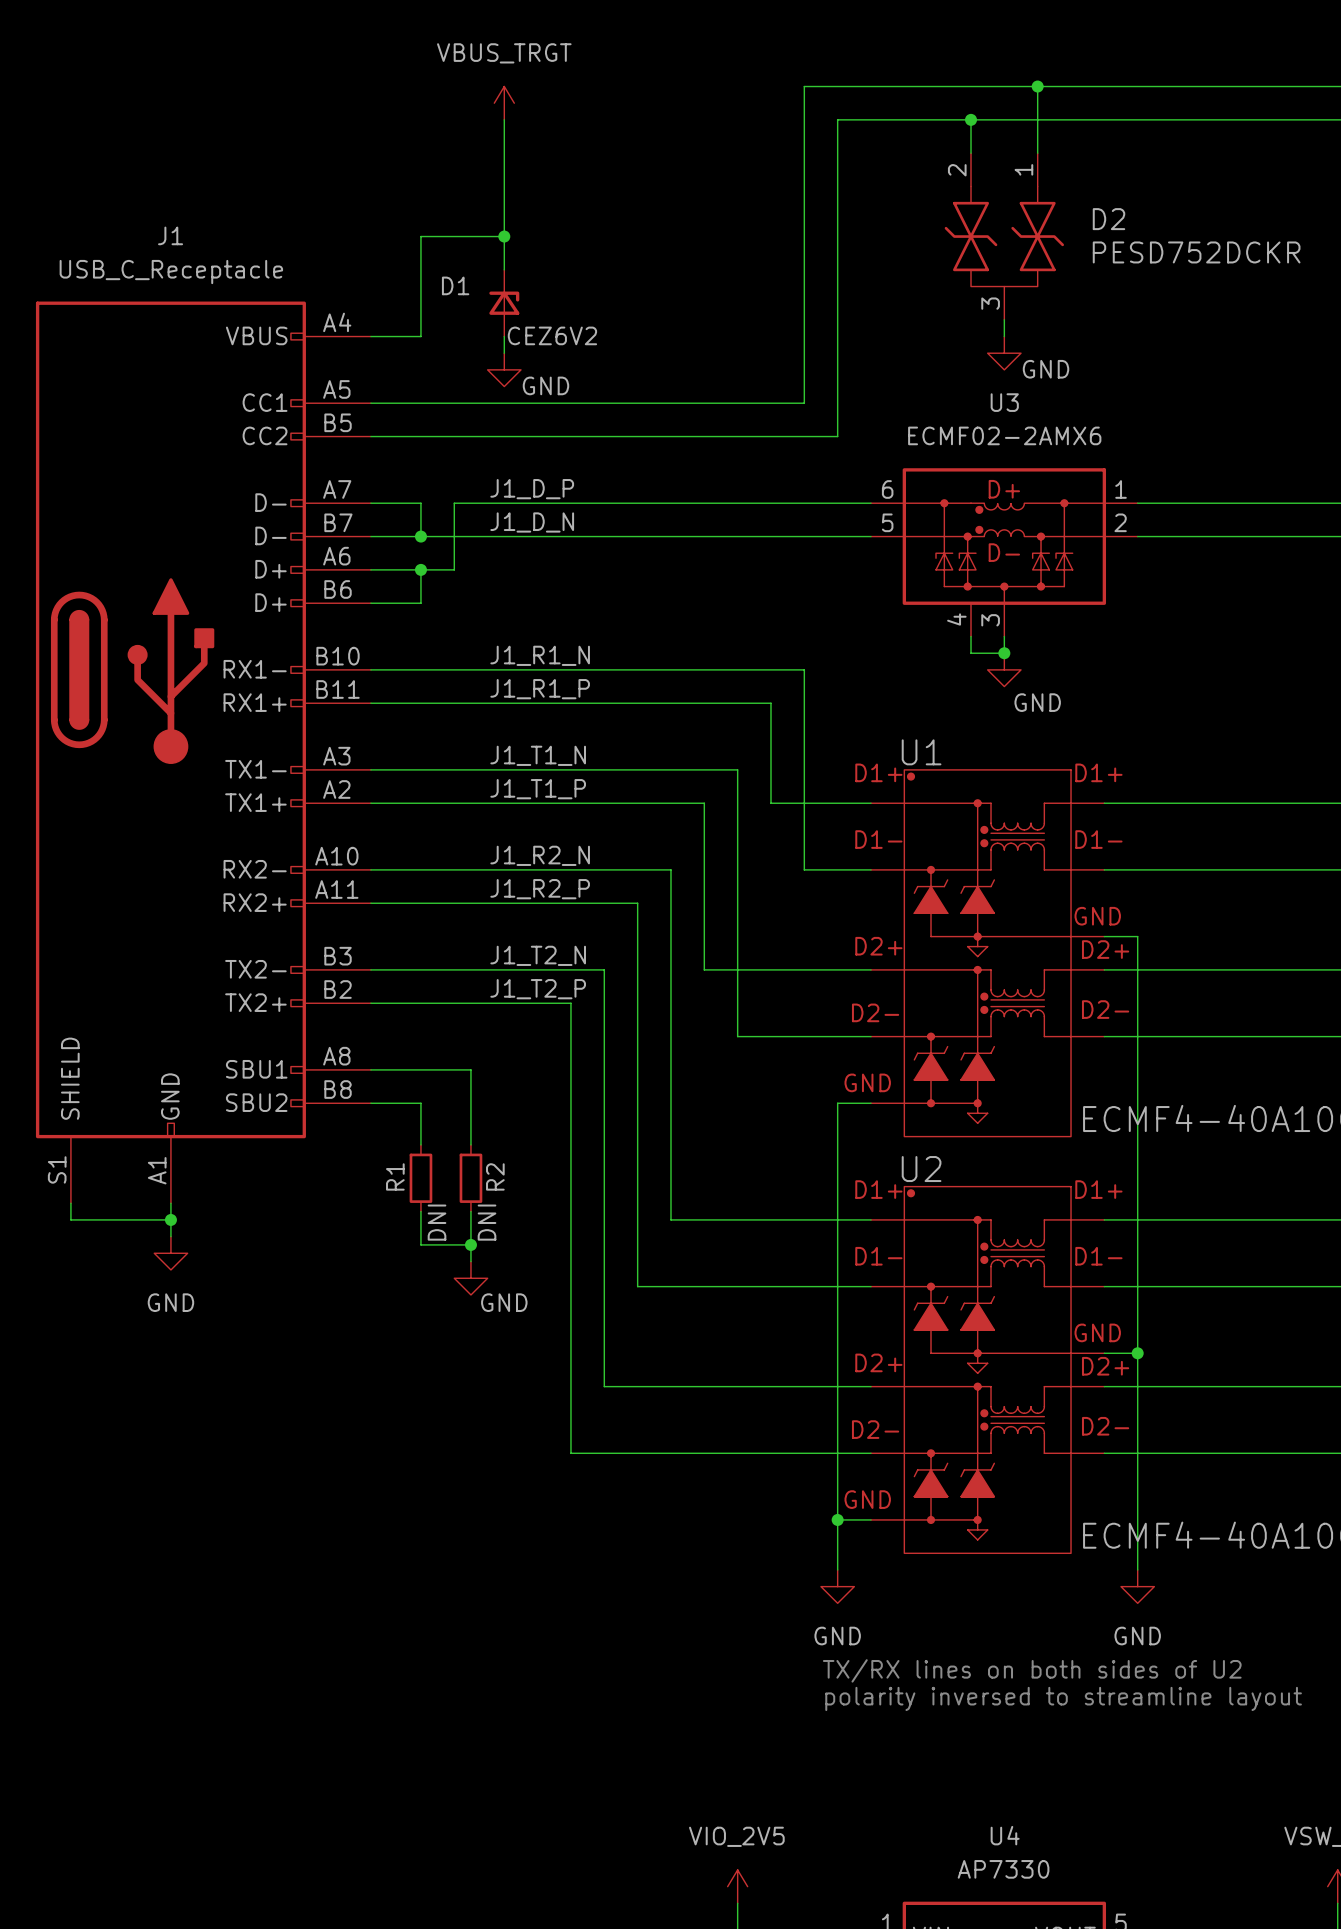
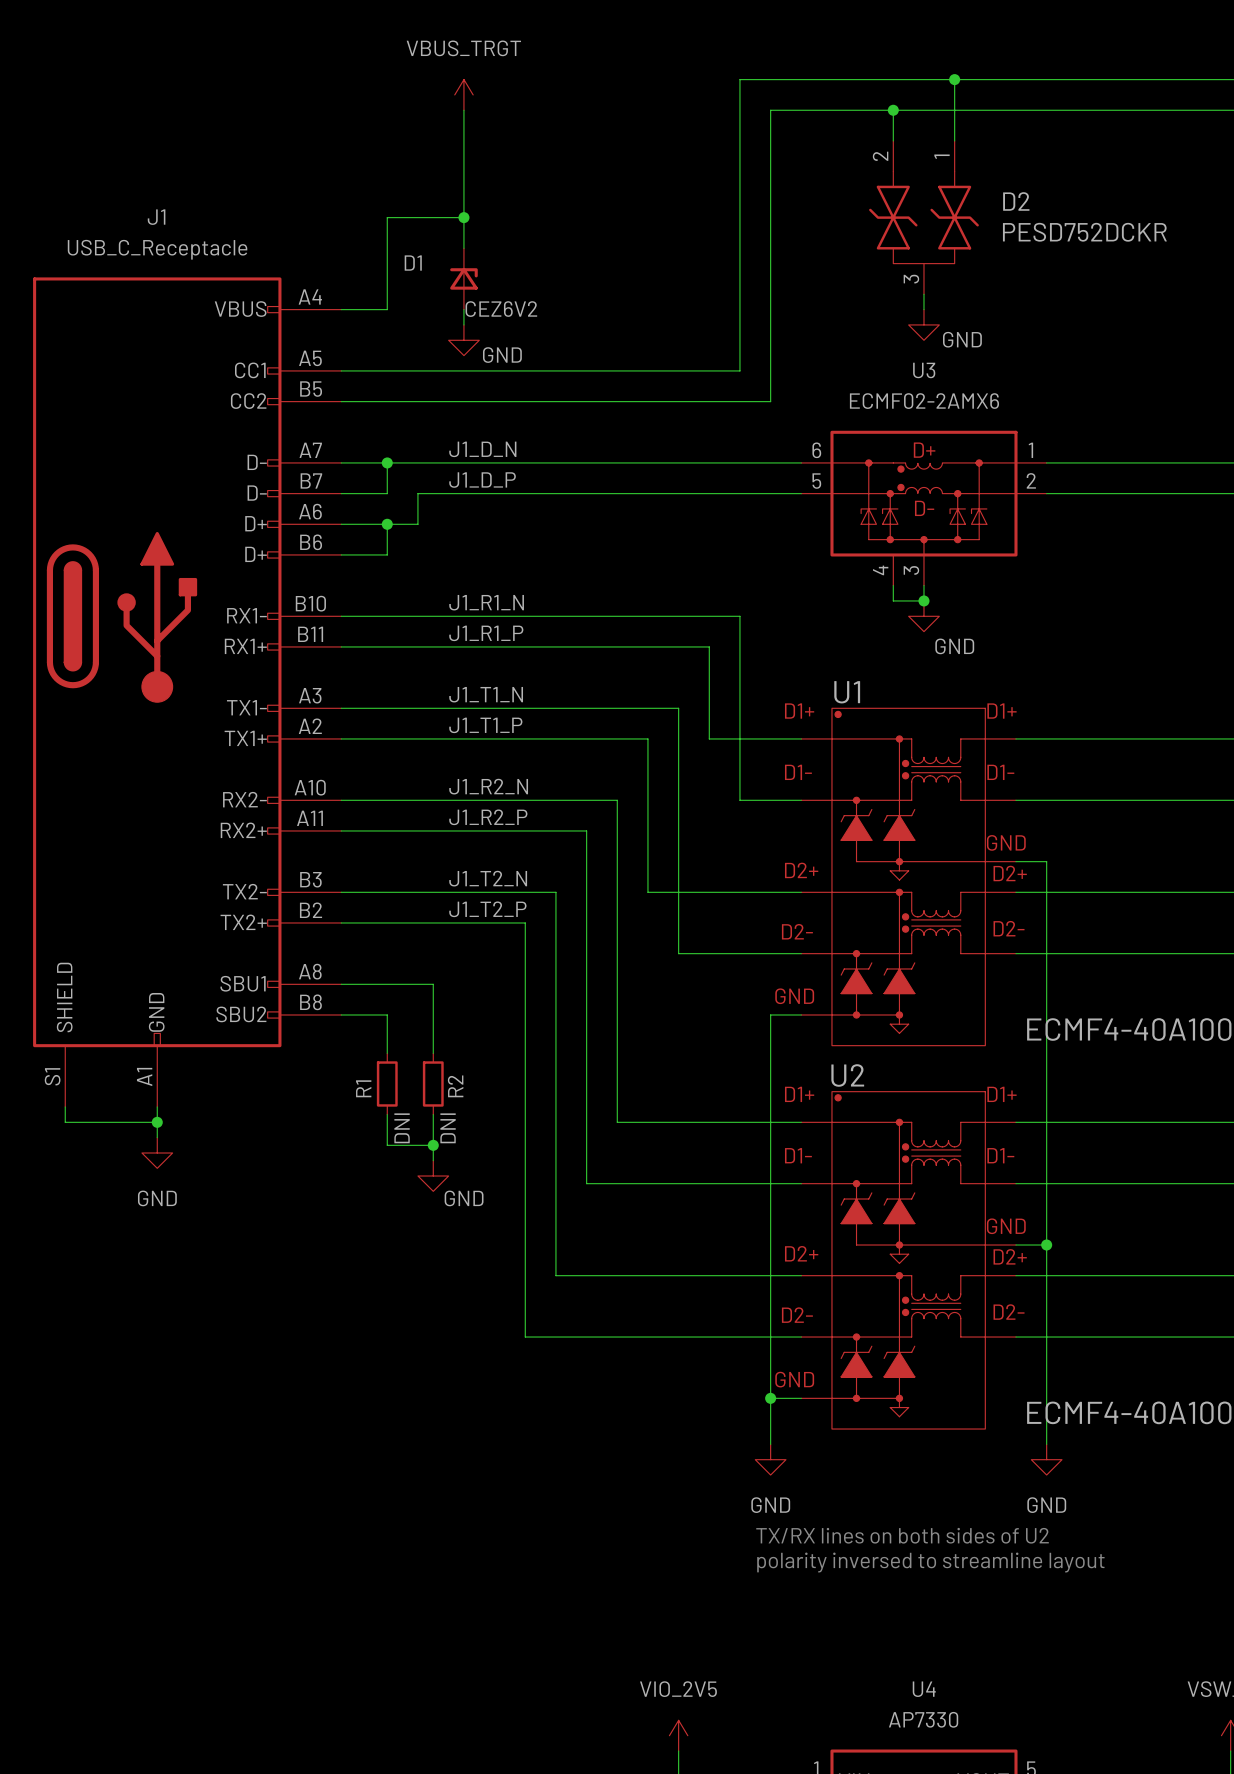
label: J1_D_P (532, 489) -> J1_D_N (482, 449)
wire: (454, 503) (454, 536) (420, 536) -> (417, 462) (387, 462)
label: J1_D_N (532, 522) -> J1_D_P (482, 480)
junction position: (420, 536) -> (387, 462)

